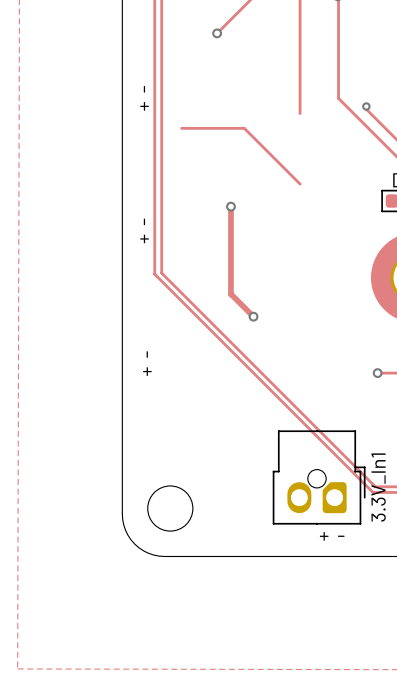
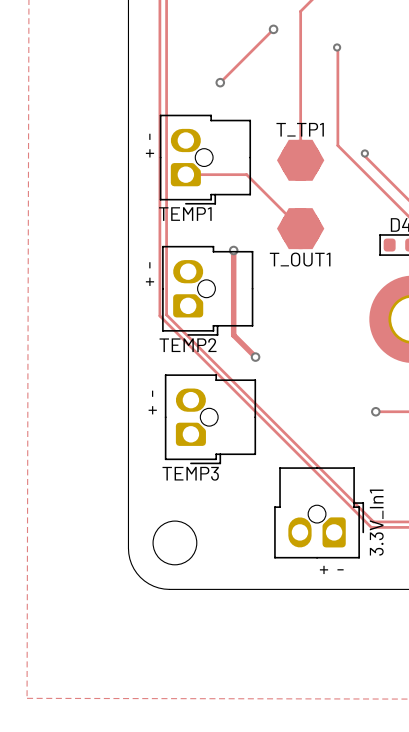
TEMP1: none -> (205, 159)
T_TP1: none -> (300, 160)
T_OUT1: none -> (300, 228)
TEMP2: none -> (207, 290)
TEMP3: none -> (210, 419)

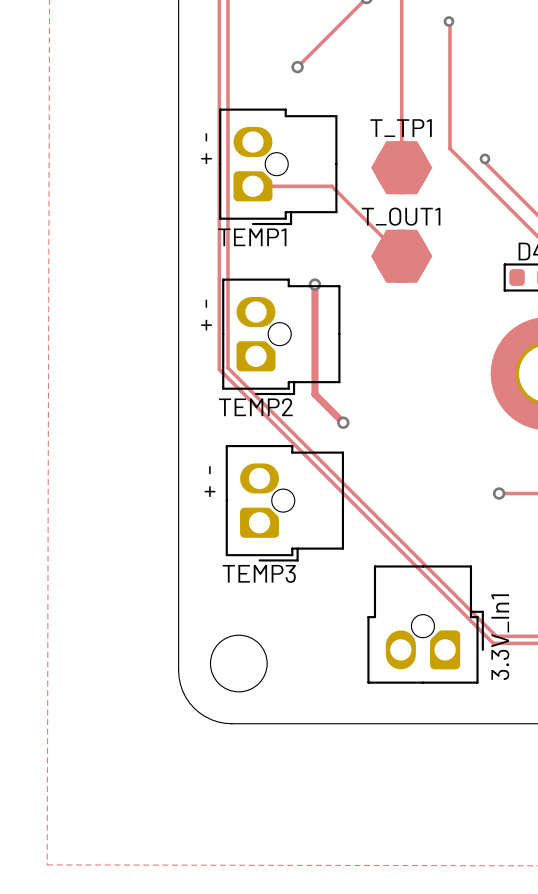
T_OUT1 name position: T_OUT1 (300, 259) -> T_OUT1 (401, 216)
text: - + (331, 569) -> none

